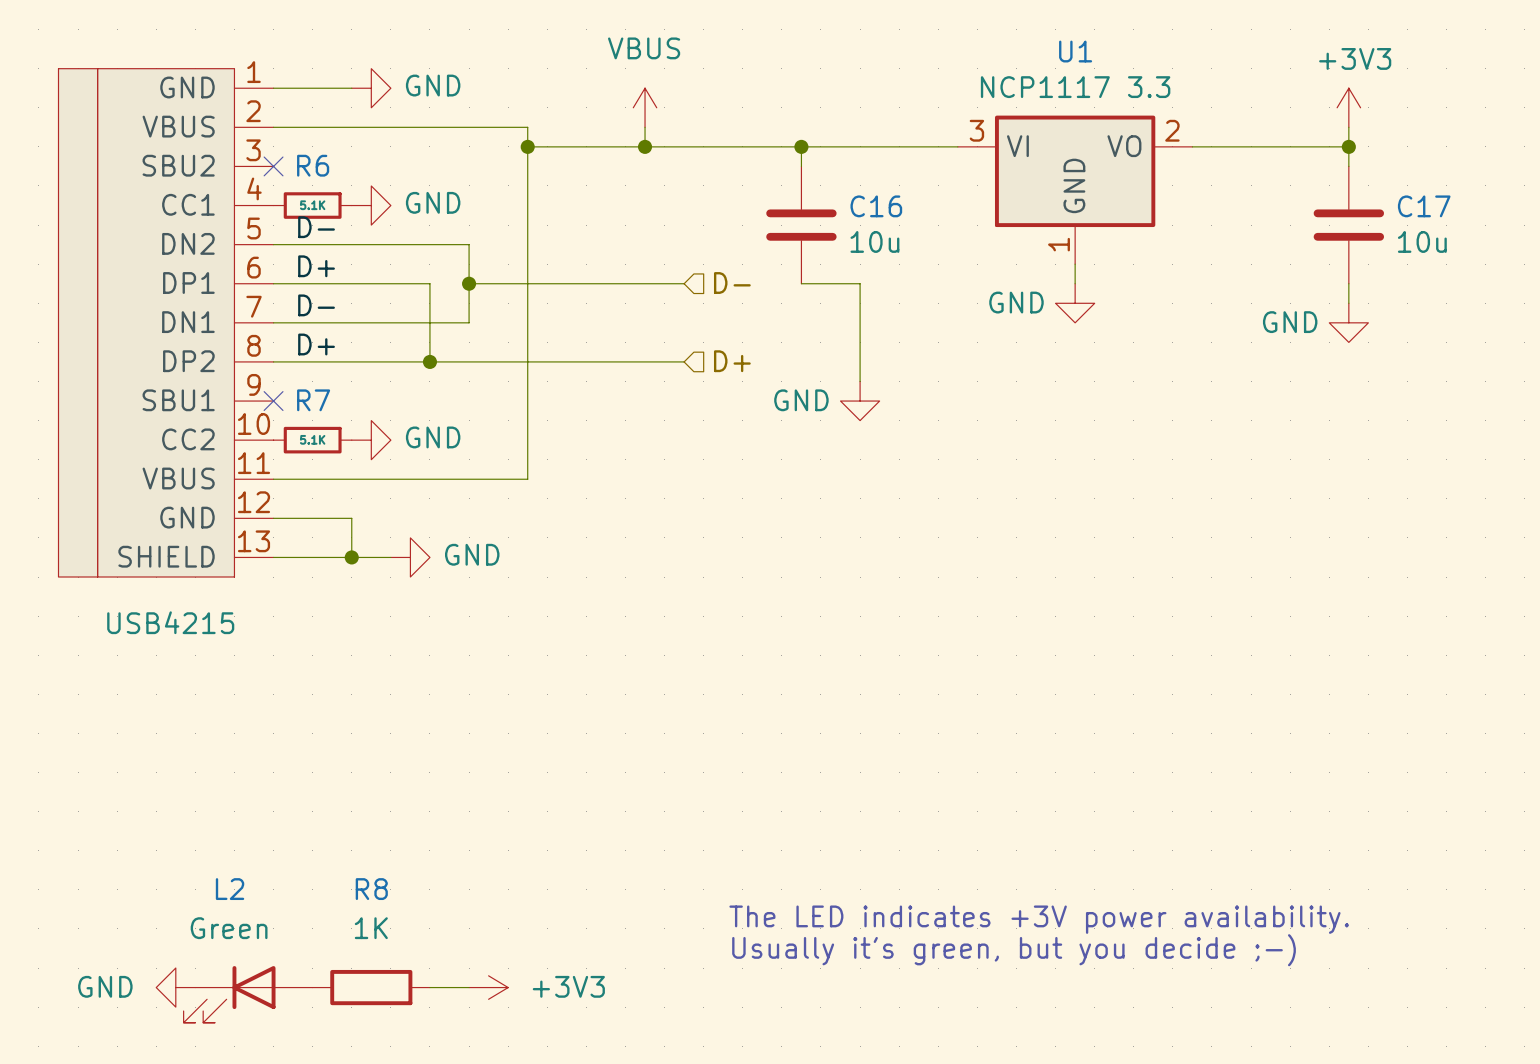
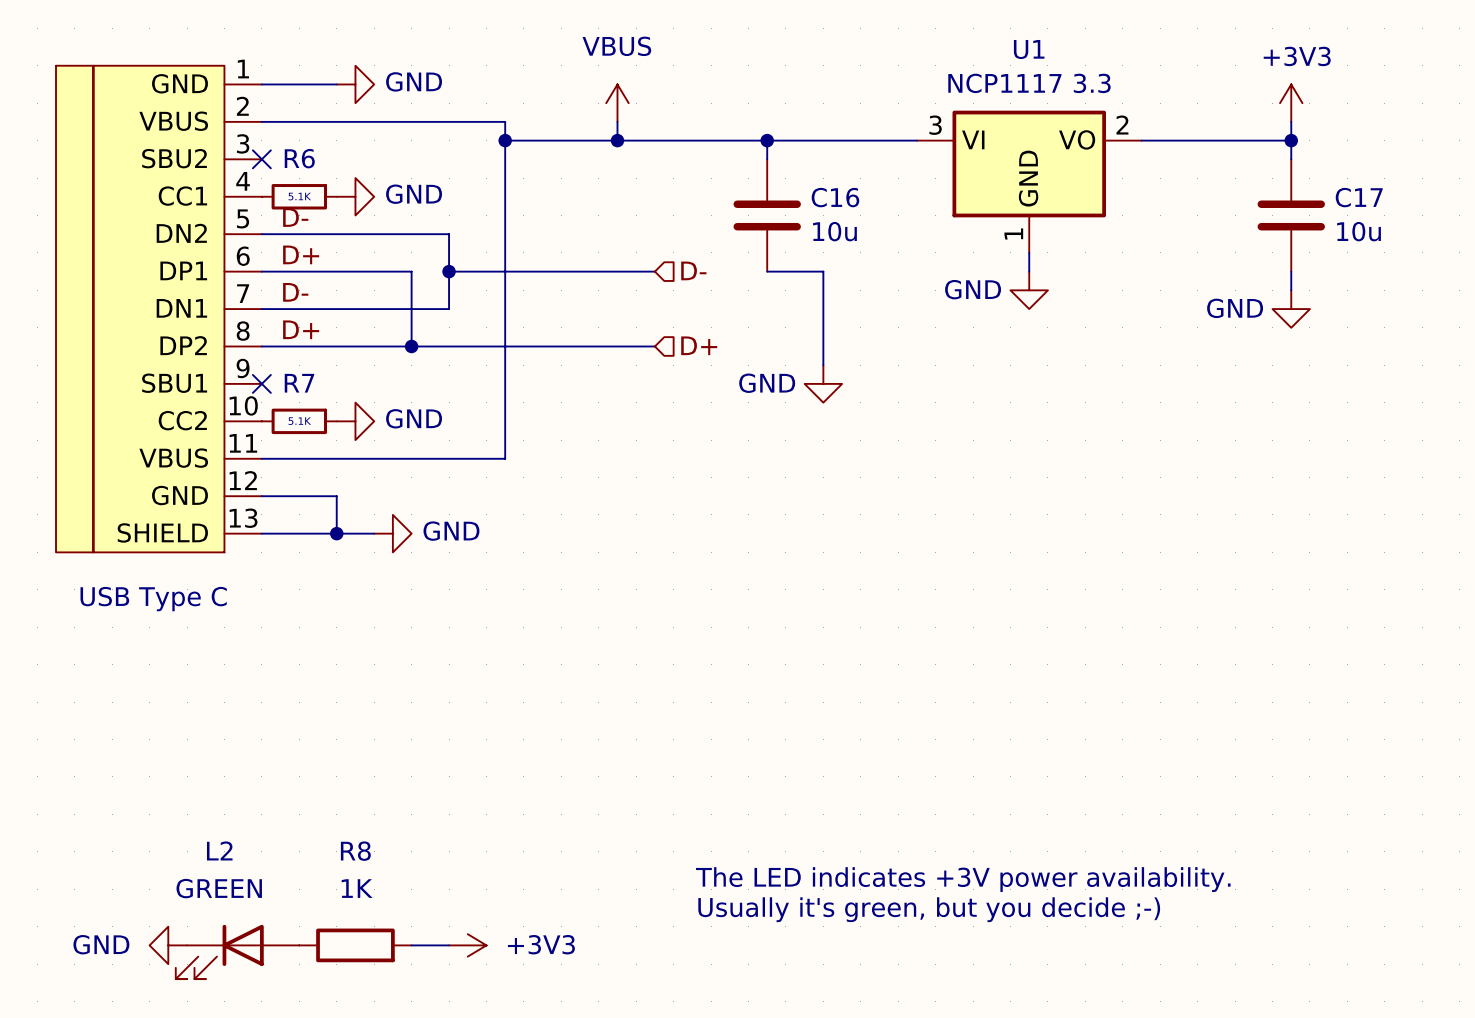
part value: USB4215 (170, 622) -> USB Type C (153, 599)
L2 value: Green (229, 928) -> GREEN (219, 888)

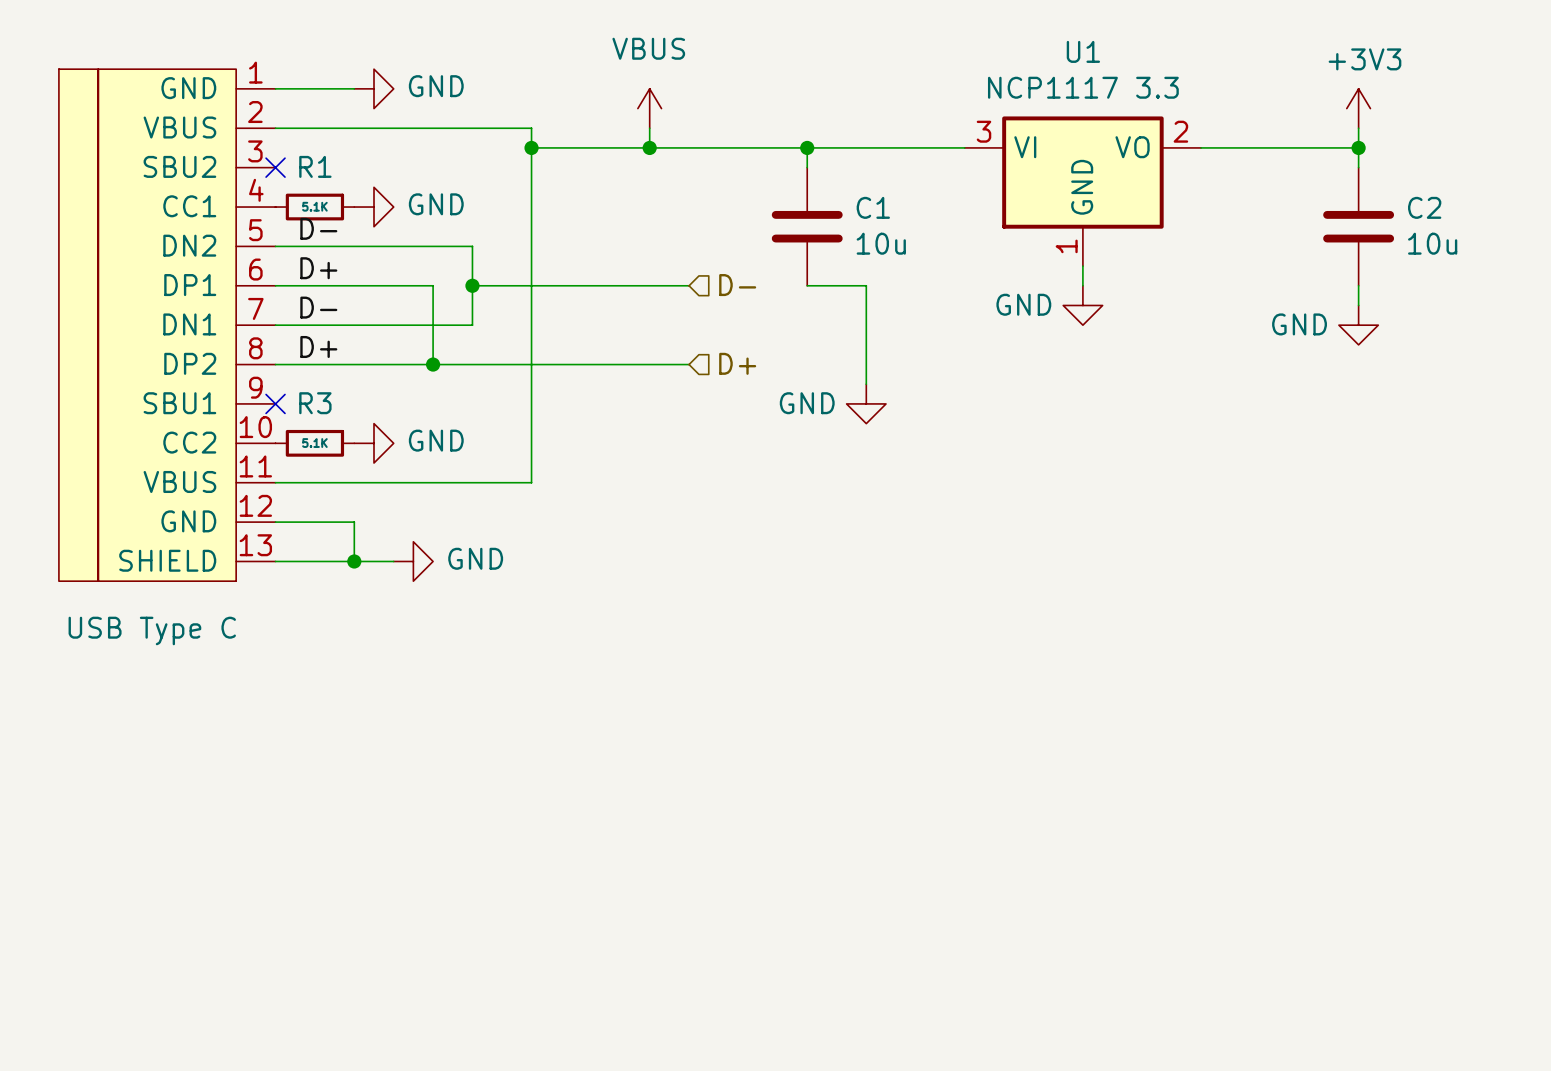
R6 name: R6 (299, 158) -> R1 (315, 166)
C16 name: C16 (835, 197) -> C1 (873, 207)
C17 name: C17 (1359, 197) -> C2 (1424, 207)
R7 name: R7 (299, 383) -> R3 (315, 403)
text: The LED indicates +3V power availability. (963, 879) -> none
text: Usually it's green, but you decide ;-) (929, 909) -> none
power symbol: GND (168, 945) -> none
R8: 1K (355, 945) -> none
wire: (411, 945) (449, 945) -> none
power symbol: +3V3 (467, 945) -> none
L2: GREEN (237, 951) -> none

